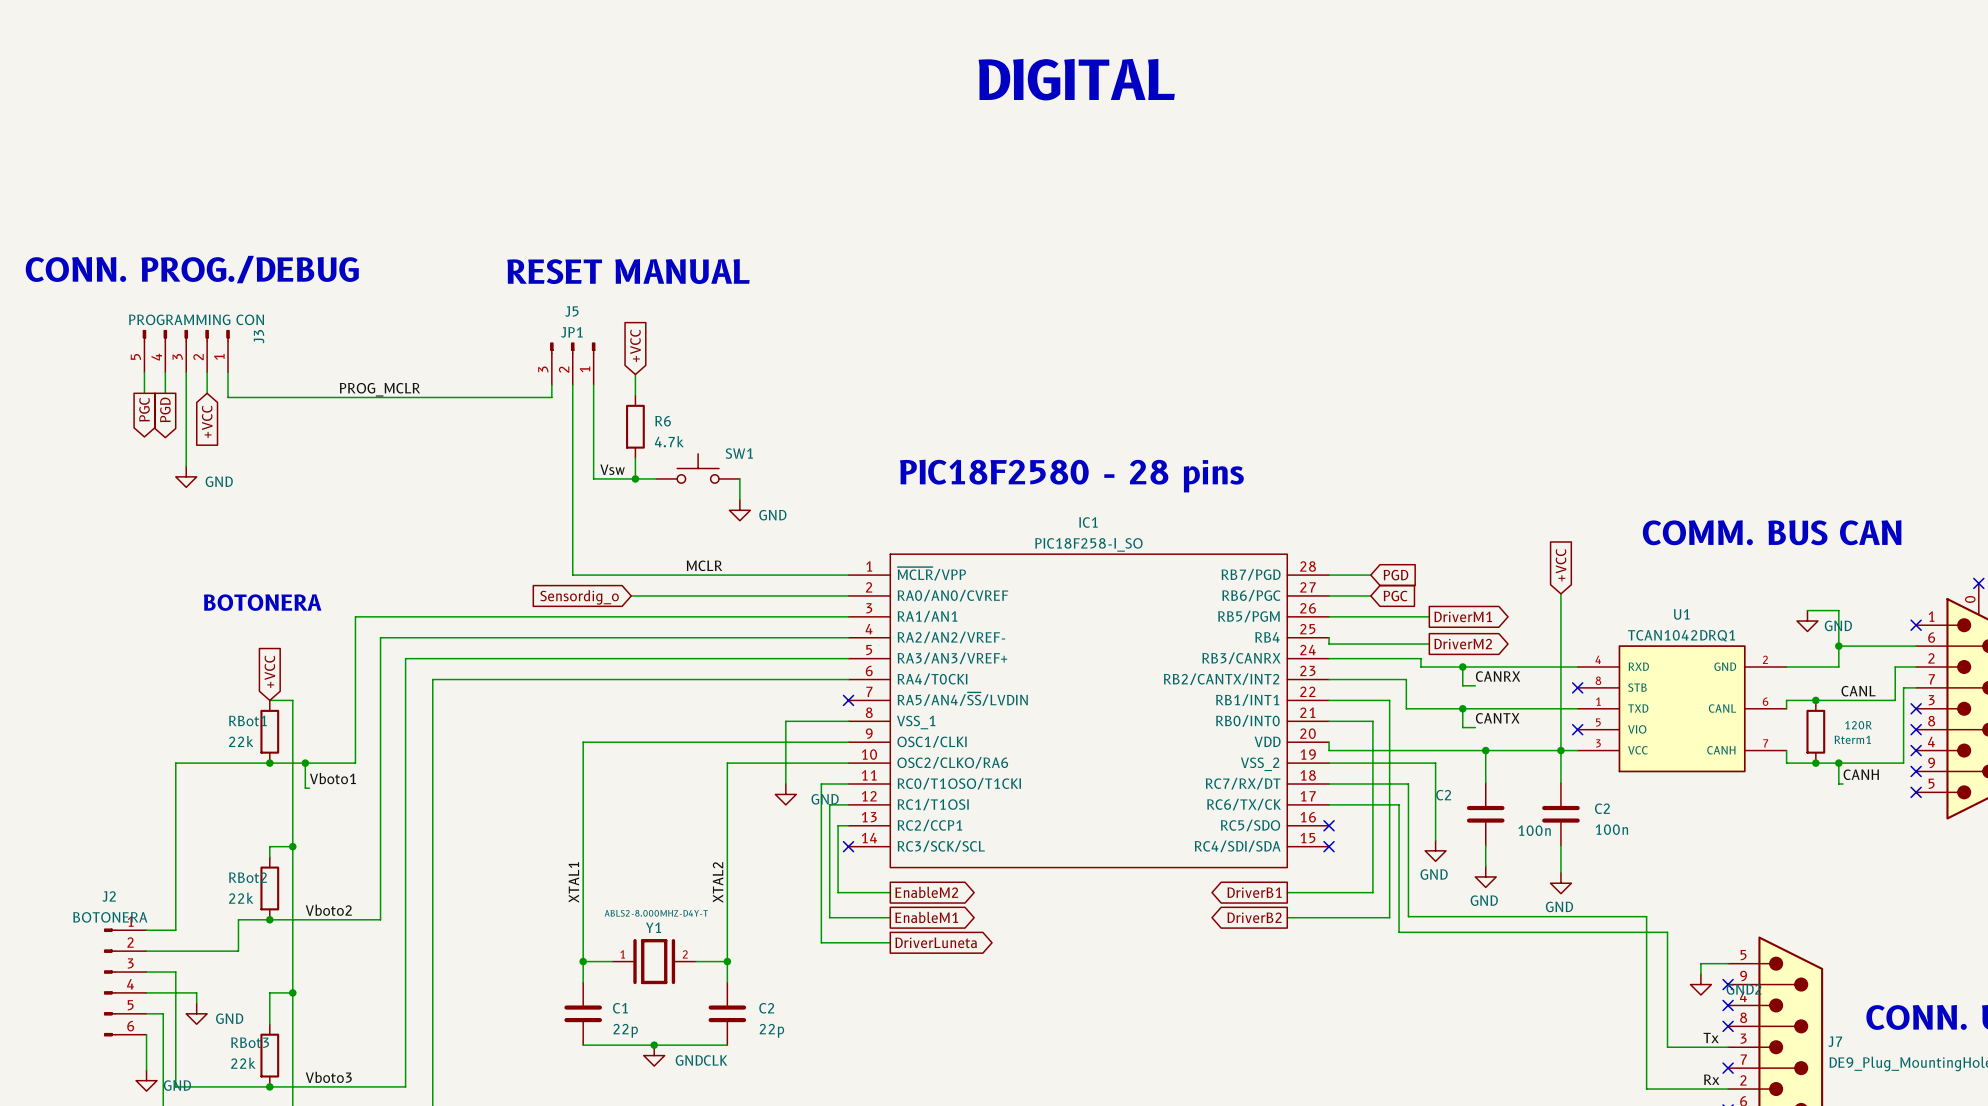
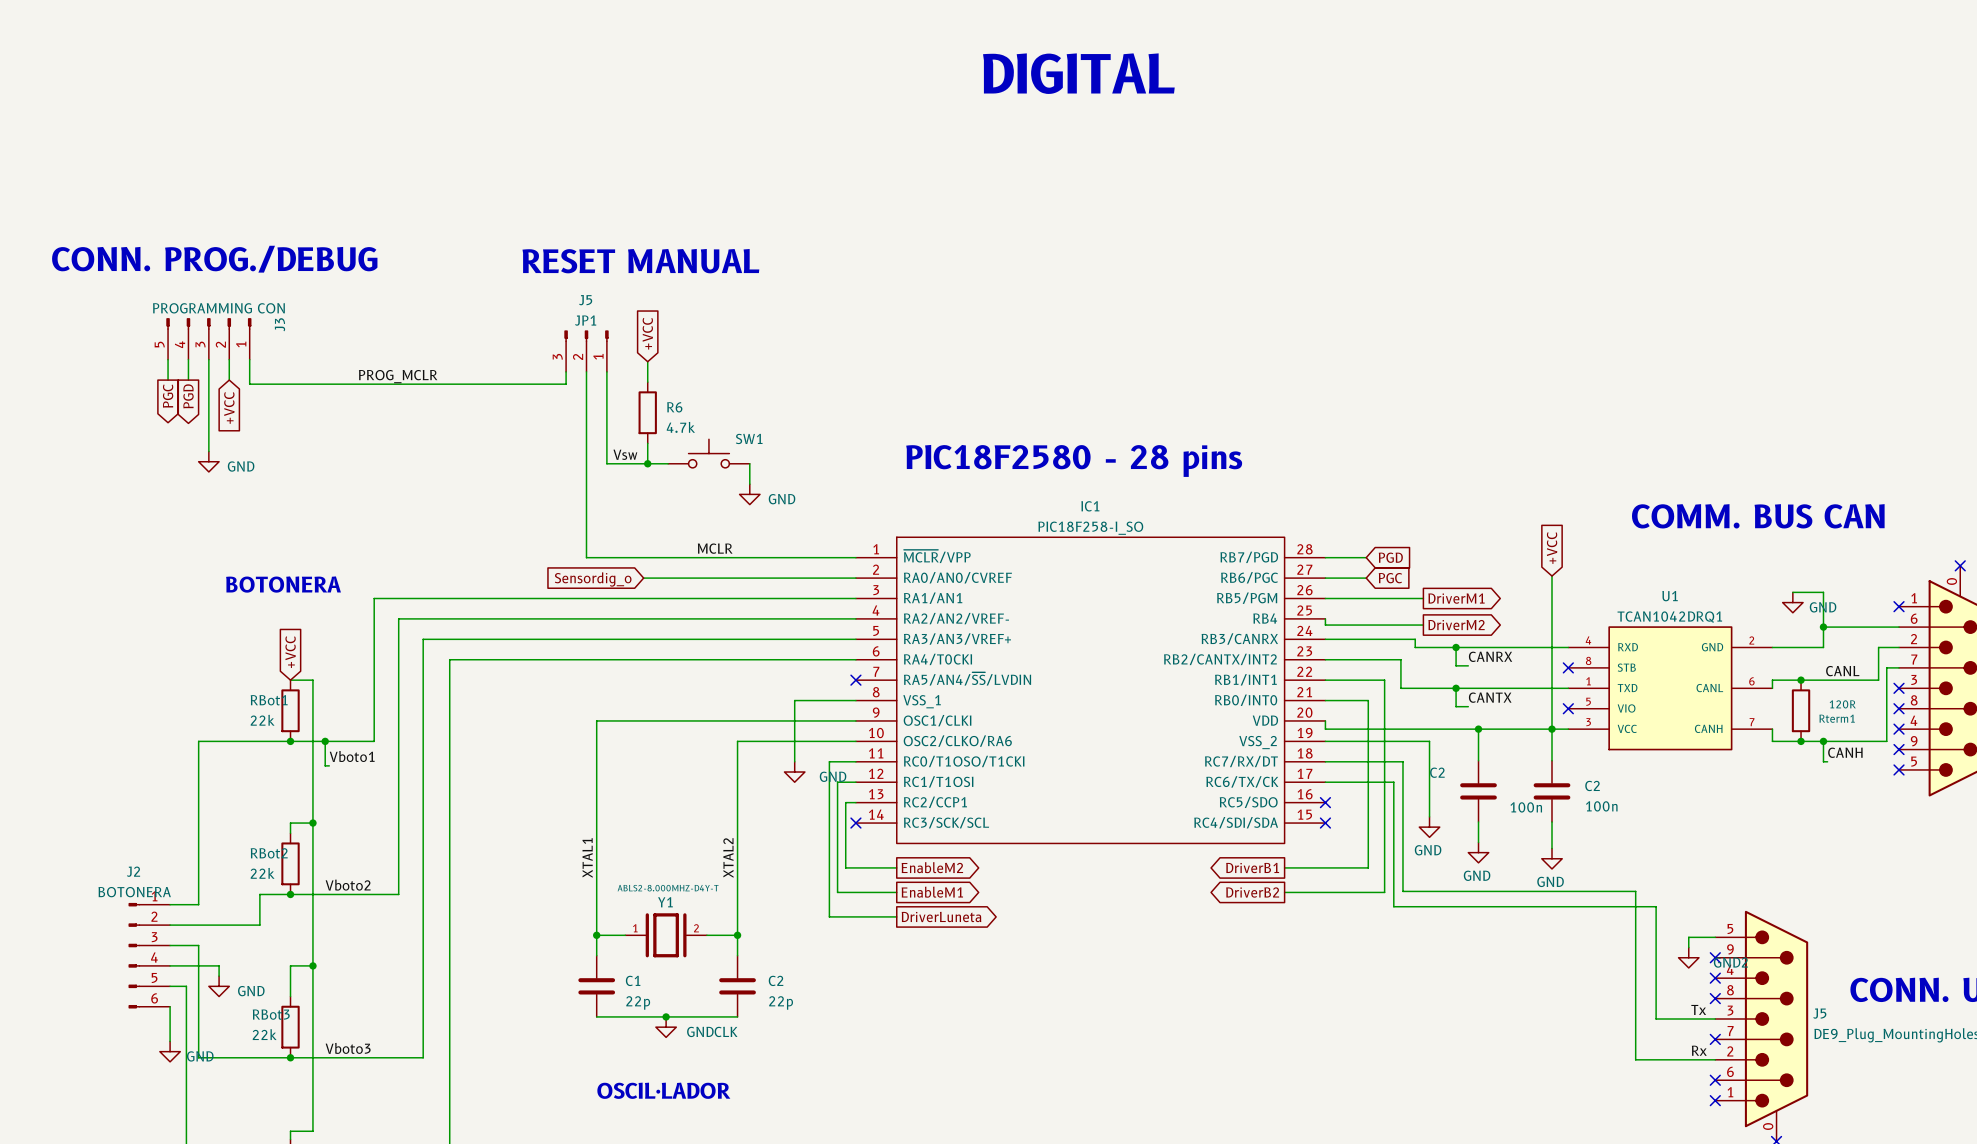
J7 name: J7 (1835, 1041) -> J5 (1819, 1013)

